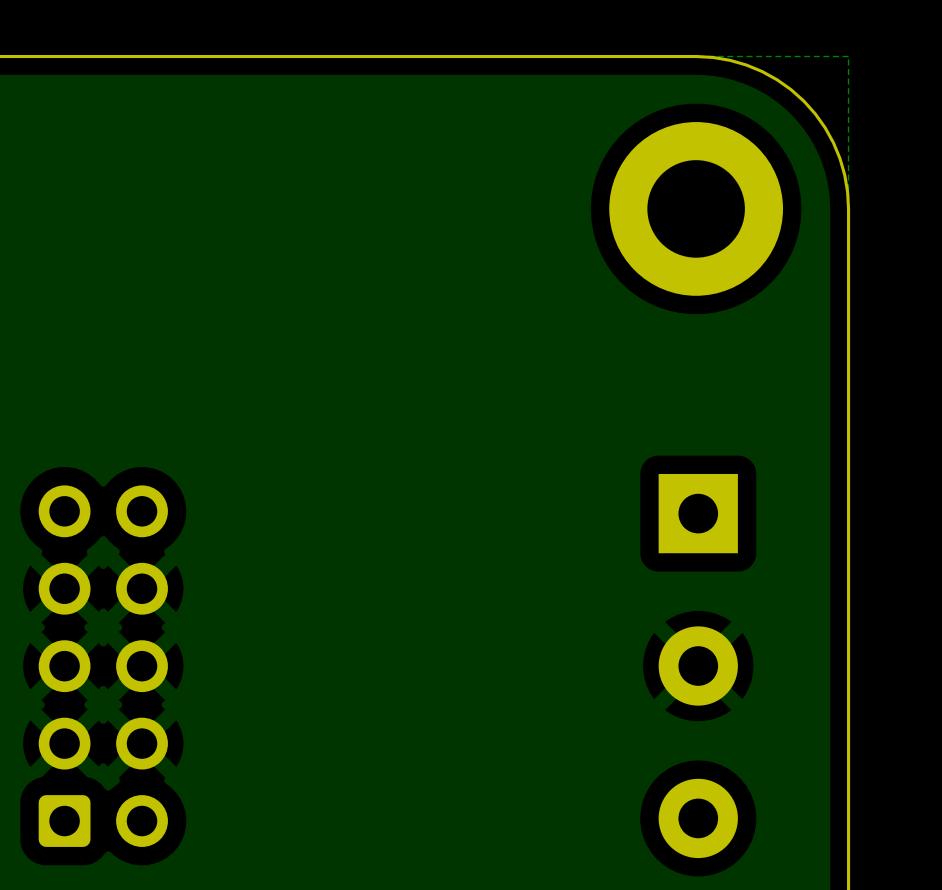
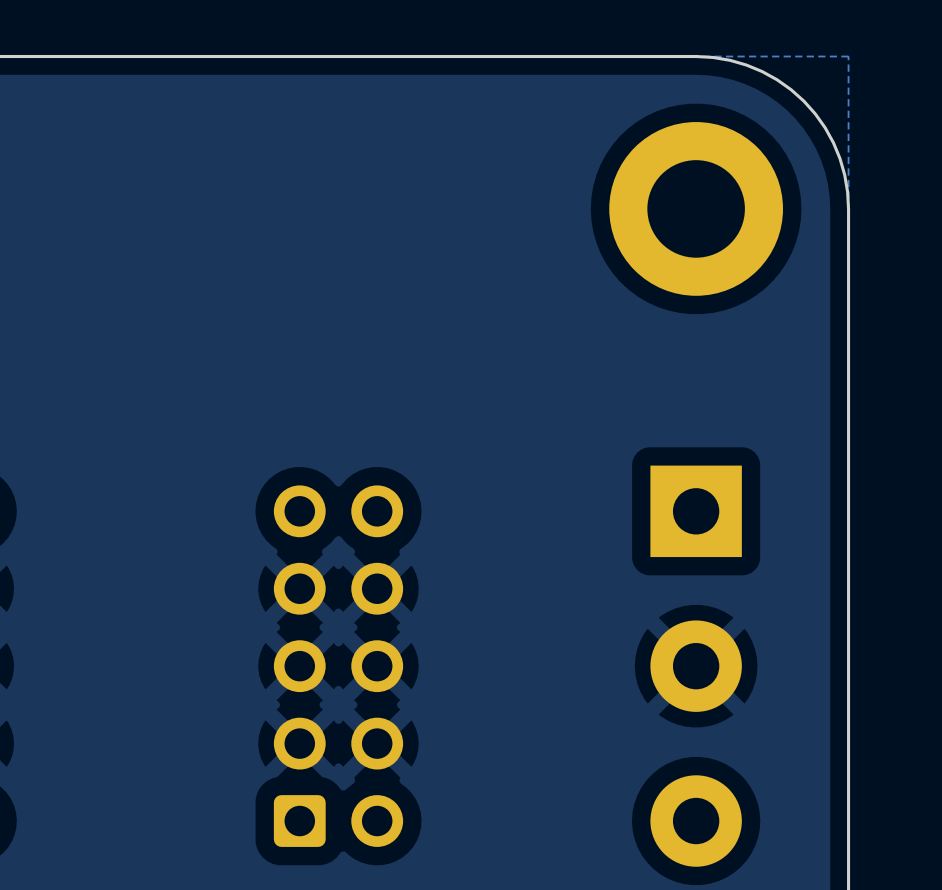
part footprint: [658, 473, 738, 859] -> [650, 465, 742, 867]
part: (103, 666) -> none
part: none -> (338, 666)

